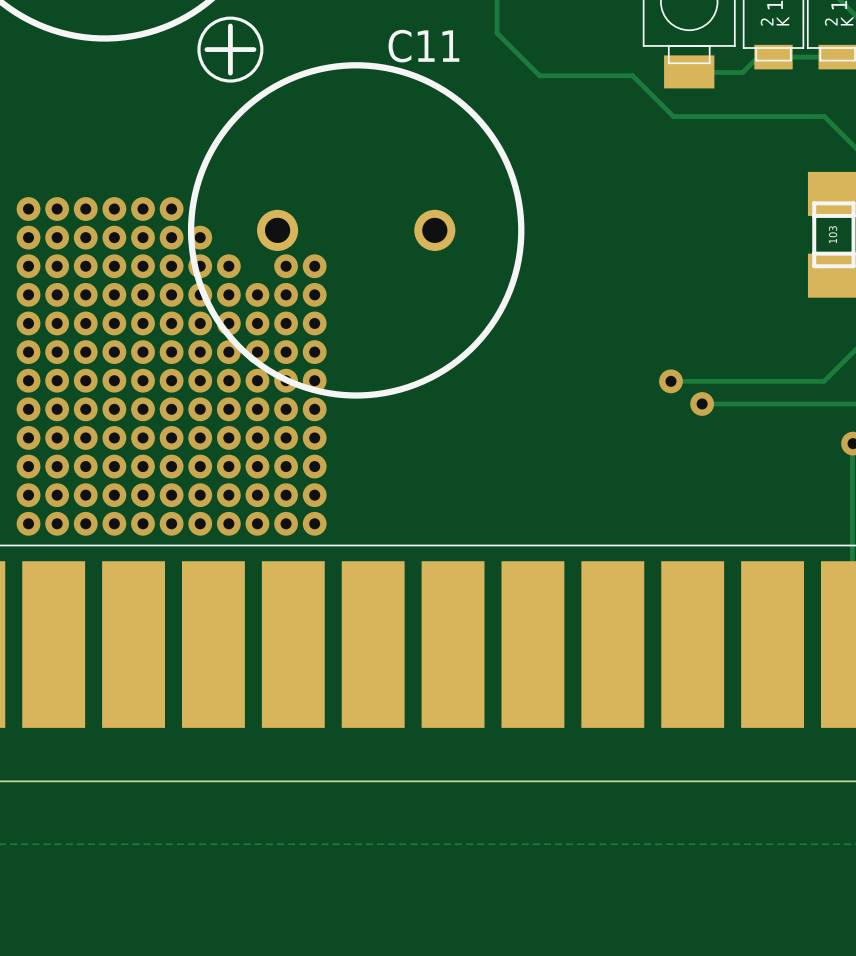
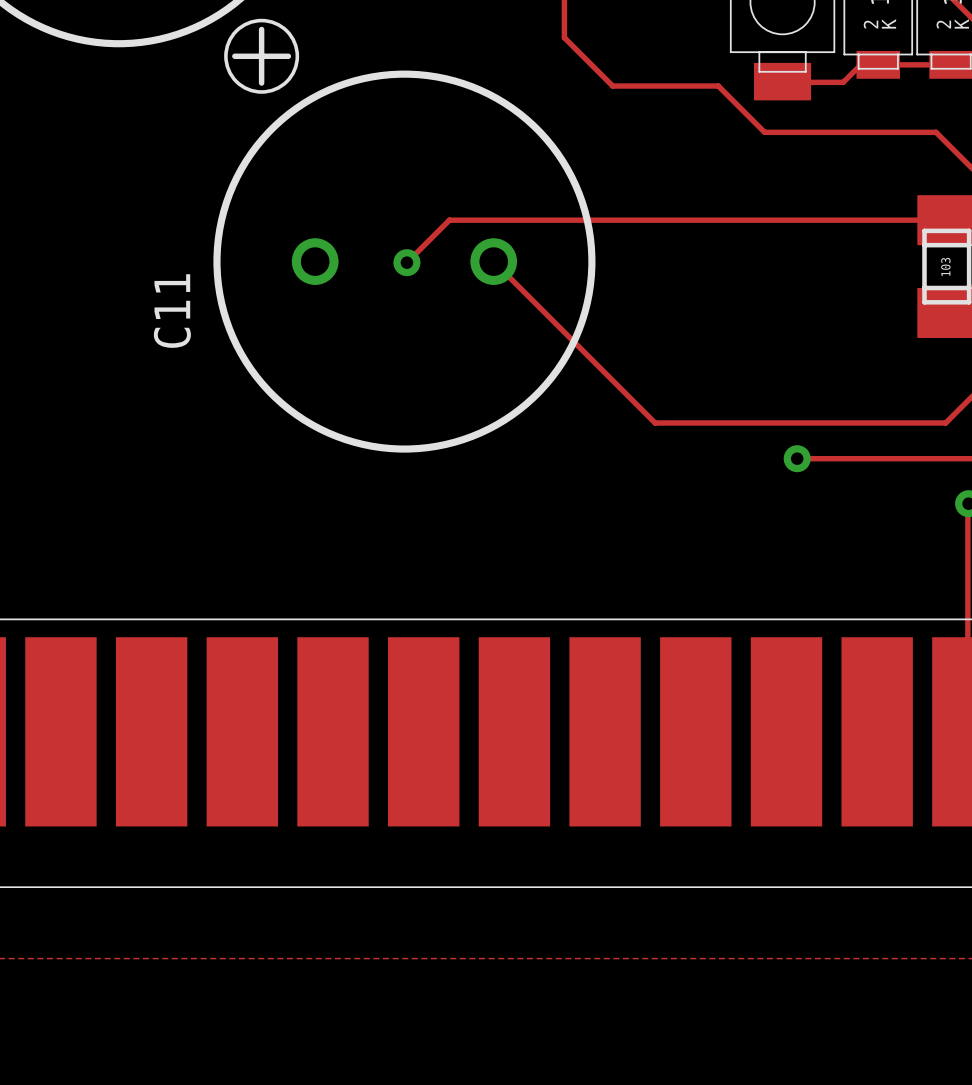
C11 name rotation: 0° (423, 46) -> 90° counterclockwise (172, 311)
C11 name position: C11 (423, 46) -> C11 (172, 311)
track: none -> (946, 220) (449, 220) (406, 262)
via: (28, 209) -> none
via: (57, 209) -> none
via: (85, 209) -> none
via: (114, 209) -> none
via: (142, 209) -> none
via: (171, 209) -> none
via: none -> (406, 262)
via: (28, 237) -> none
via: (57, 237) -> none
via: (85, 237) -> none
via: (114, 237) -> none
via: (142, 237) -> none
via: (171, 237) -> none
via: (200, 237) -> none
via: (28, 266) -> none
via: (57, 266) -> none
via: (85, 266) -> none
via: (114, 266) -> none
via: (142, 266) -> none
via: (171, 266) -> none
via: (200, 266) -> none
via: (228, 266) -> none
via: (286, 266) -> none
via: (314, 266) -> none
via: (28, 294) -> none
via: (57, 294) -> none
via: (85, 294) -> none
via: (114, 294) -> none
via: (142, 294) -> none
via: (171, 294) -> none
via: (200, 294) -> none
via: (228, 294) -> none
via: (257, 294) -> none
via: (286, 294) -> none
via: (314, 294) -> none
via: (28, 323) -> none
via: (57, 323) -> none
via: (85, 323) -> none
via: (114, 323) -> none
via: (142, 323) -> none
via: (171, 323) -> none
via: (200, 323) -> none
via: (228, 323) -> none
via: (257, 323) -> none
via: (286, 323) -> none
via: (314, 323) -> none
via: (28, 352) -> none
via: (57, 352) -> none
via: (85, 352) -> none
via: (114, 352) -> none
via: (142, 352) -> none
via: (171, 352) -> none
via: (200, 352) -> none
via: (228, 352) -> none
via: (257, 352) -> none
via: (286, 352) -> none
via: (314, 352) -> none
track: (832, 372) (824, 381) (670, 381) -> (945, 422) (655, 422) (493, 261)
via: (28, 380) -> none
via: (57, 380) -> none
via: (85, 380) -> none
via: (114, 380) -> none
via: (142, 380) -> none
via: (171, 380) -> none
via: (200, 380) -> none
via: (228, 380) -> none
via: (257, 380) -> none
via: (286, 380) -> none
via: (314, 380) -> none
via: (670, 381) -> none
via: (28, 409) -> none
via: (57, 409) -> none
via: (85, 409) -> none
via: (114, 409) -> none
via: (142, 409) -> none
via: (171, 409) -> none
via: (200, 409) -> none
via: (228, 409) -> none
via: (257, 409) -> none
via: (286, 409) -> none
via: (314, 409) -> none
via: (28, 437) -> none
via: (57, 437) -> none
via: (85, 437) -> none
via: (114, 437) -> none
via: (142, 437) -> none
via: (171, 437) -> none
via: (200, 437) -> none
via: (228, 437) -> none
via: (257, 437) -> none
via: (286, 437) -> none
via: (314, 437) -> none
via: (28, 466) -> none
via: (57, 466) -> none
via: (85, 466) -> none
via: (114, 466) -> none
via: (142, 466) -> none
via: (171, 466) -> none
via: (200, 466) -> none
via: (228, 466) -> none
via: (257, 466) -> none
via: (286, 466) -> none
via: (314, 466) -> none
via: (28, 495) -> none
via: (57, 495) -> none
via: (85, 495) -> none
via: (114, 495) -> none
via: (142, 495) -> none
via: (171, 495) -> none
via: (200, 495) -> none
via: (228, 495) -> none
via: (257, 495) -> none
via: (286, 495) -> none
via: (314, 495) -> none
via: (28, 523) -> none
via: (57, 523) -> none
via: (85, 523) -> none
via: (114, 523) -> none
via: (142, 523) -> none
via: (171, 523) -> none
via: (200, 523) -> none
via: (228, 523) -> none
via: (257, 523) -> none
via: (286, 523) -> none
via: (314, 523) -> none

